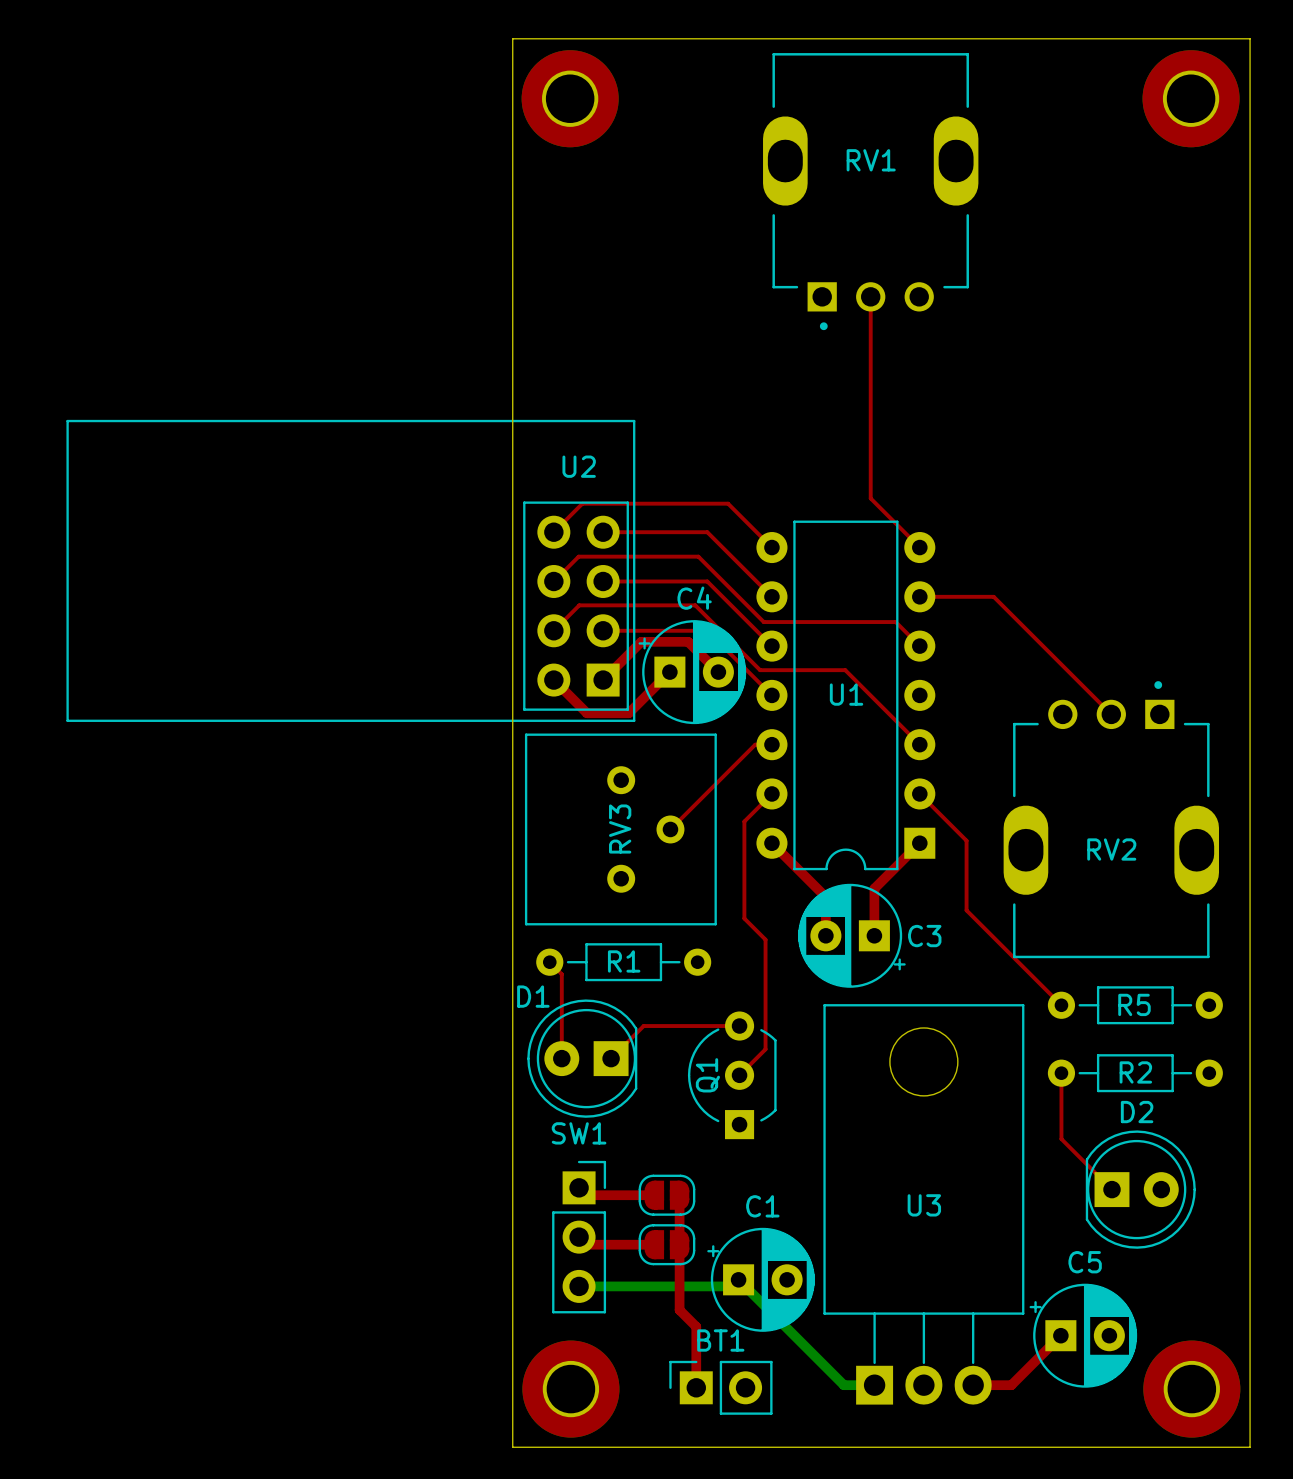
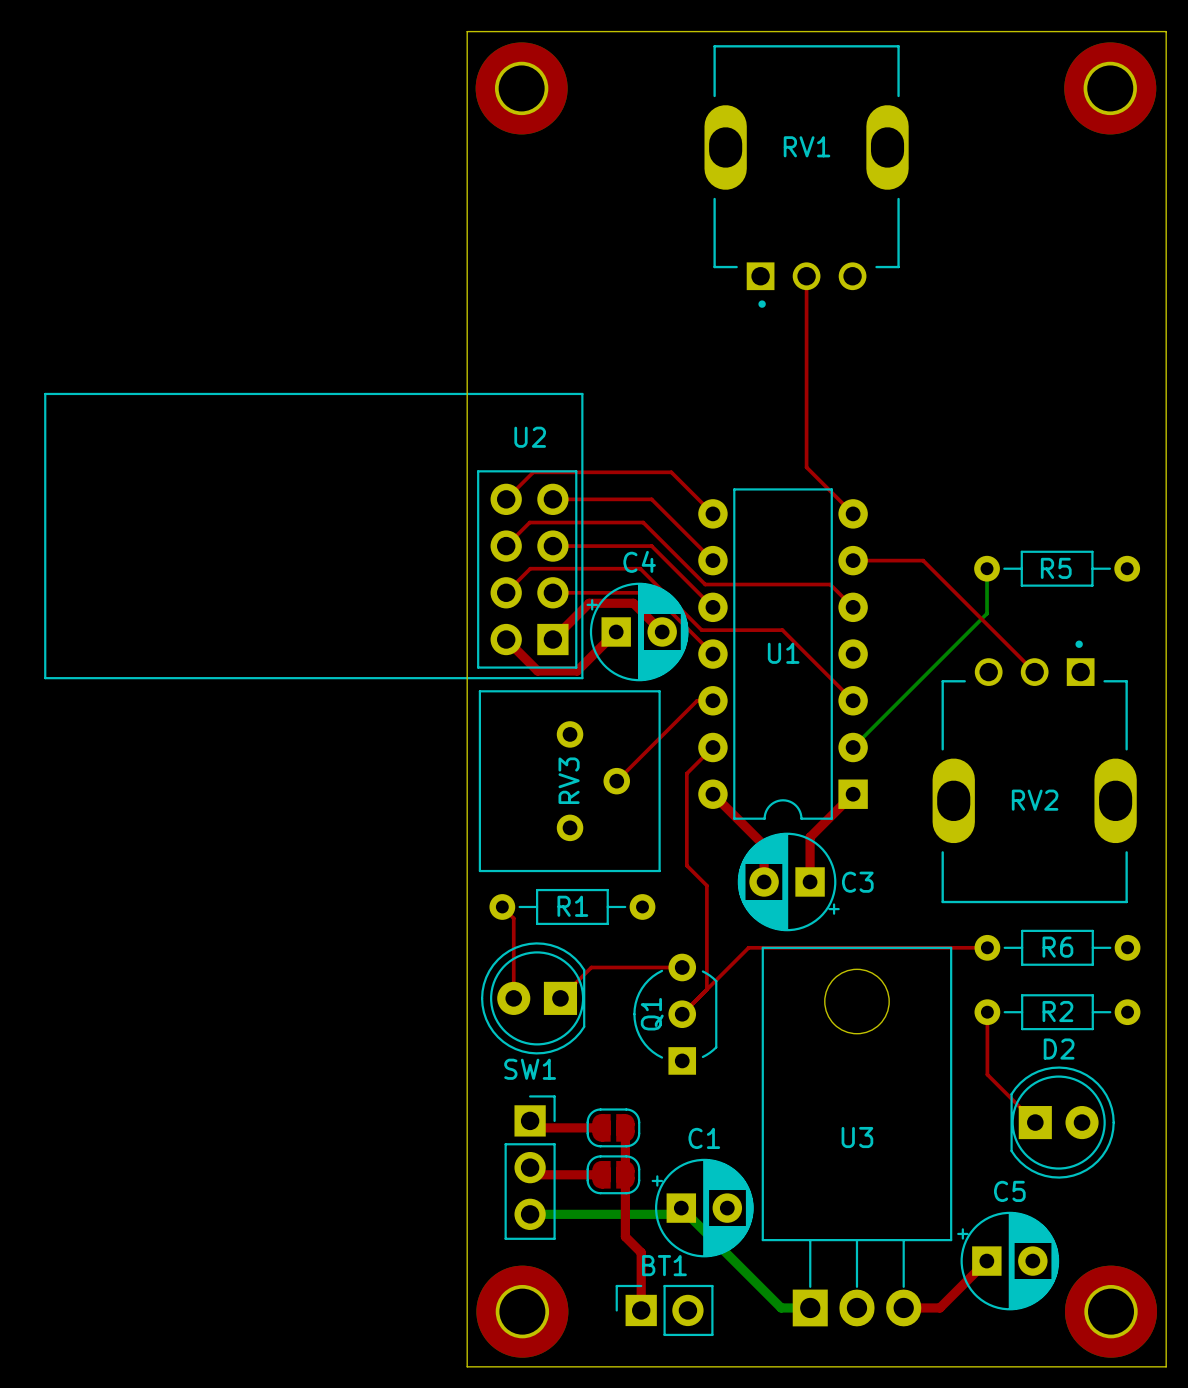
bottom track: none -> (987, 568) (987, 613) (853, 747)
R5: none -> (1057, 568)
top track: (919, 793) (966, 840) (966, 910) (1061, 1005) -> (706, 989) (748, 947) (987, 947)
D1 name: D1 (533, 996) -> none
R5 name: R5 (1134, 1004) -> R6 (1057, 947)

